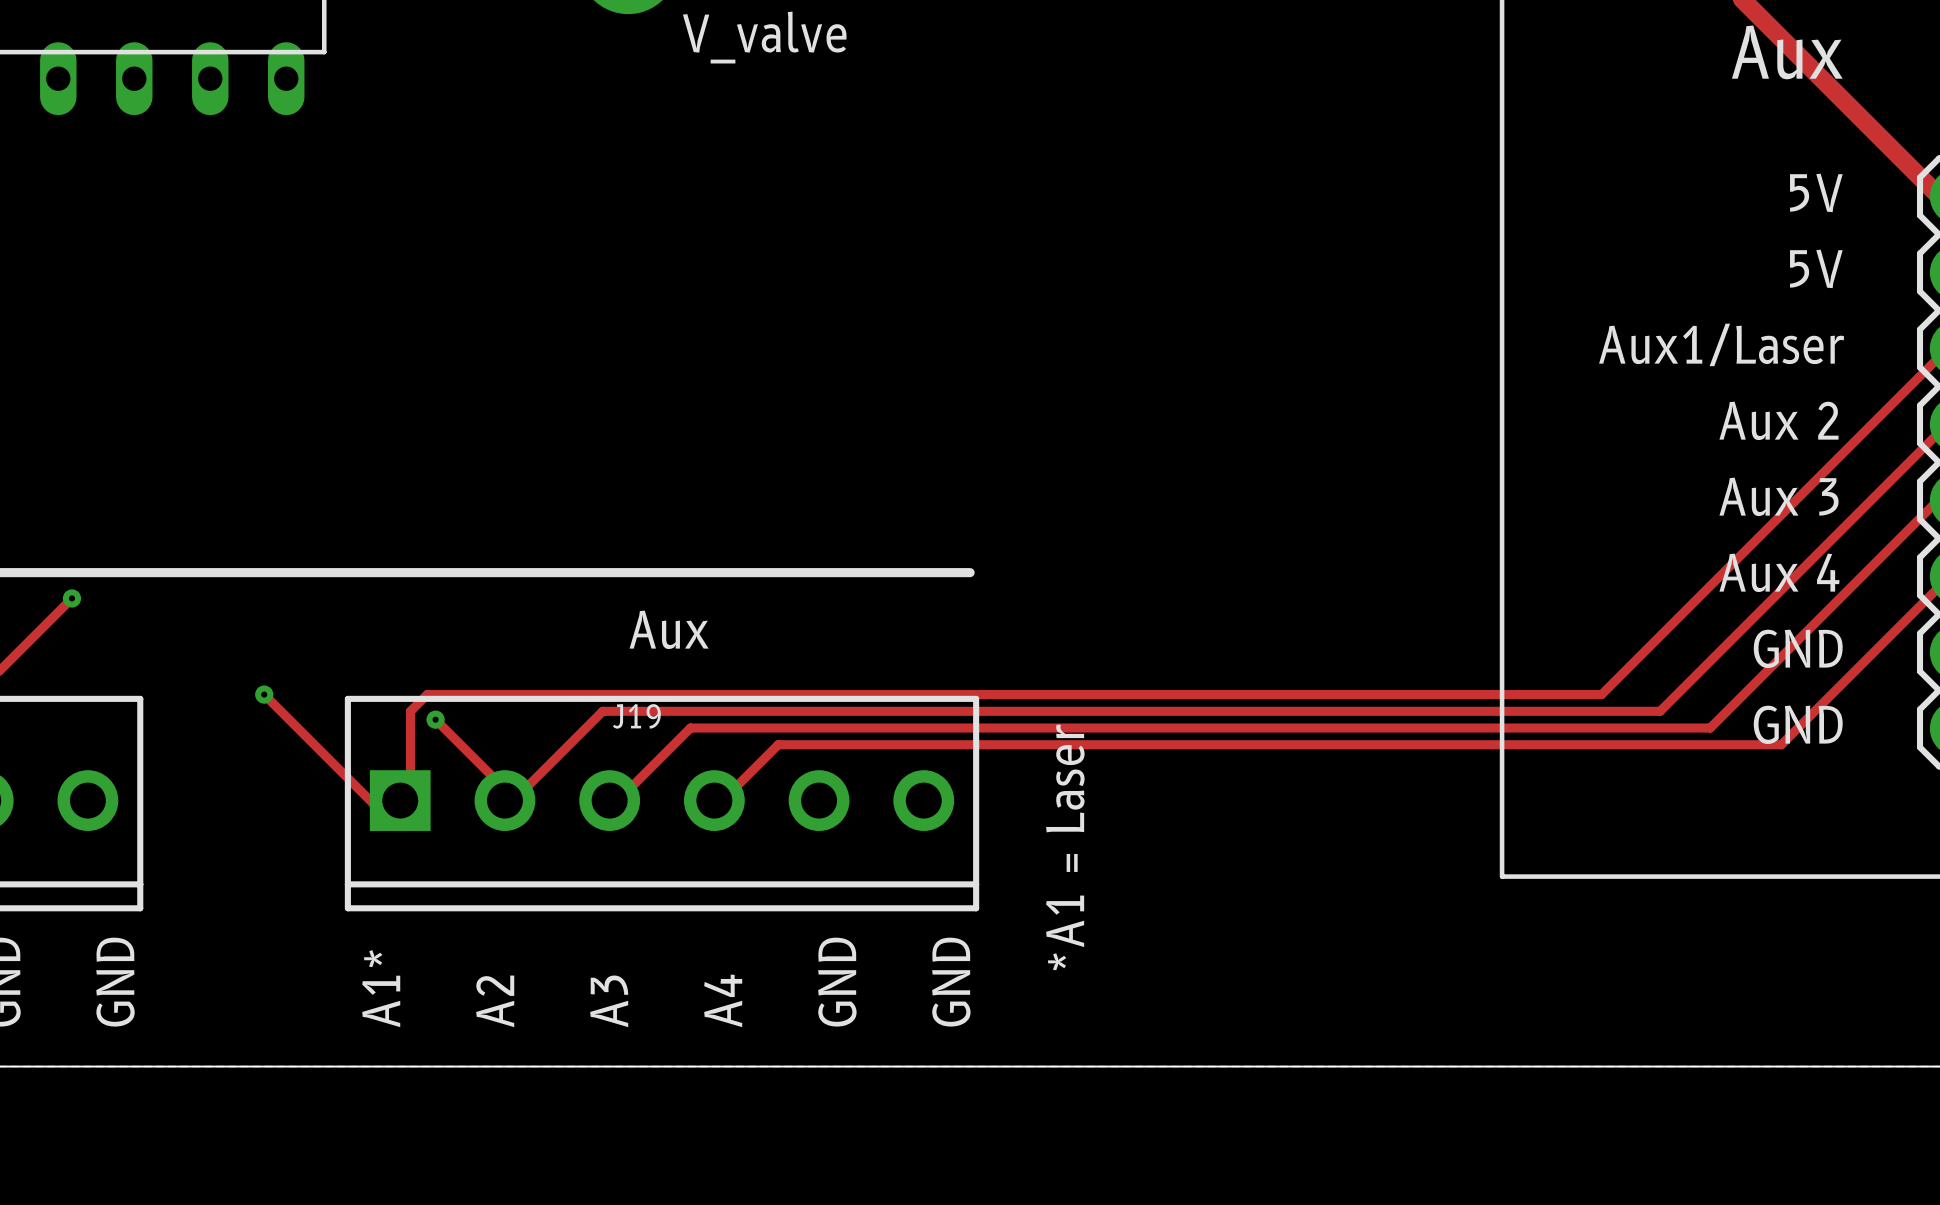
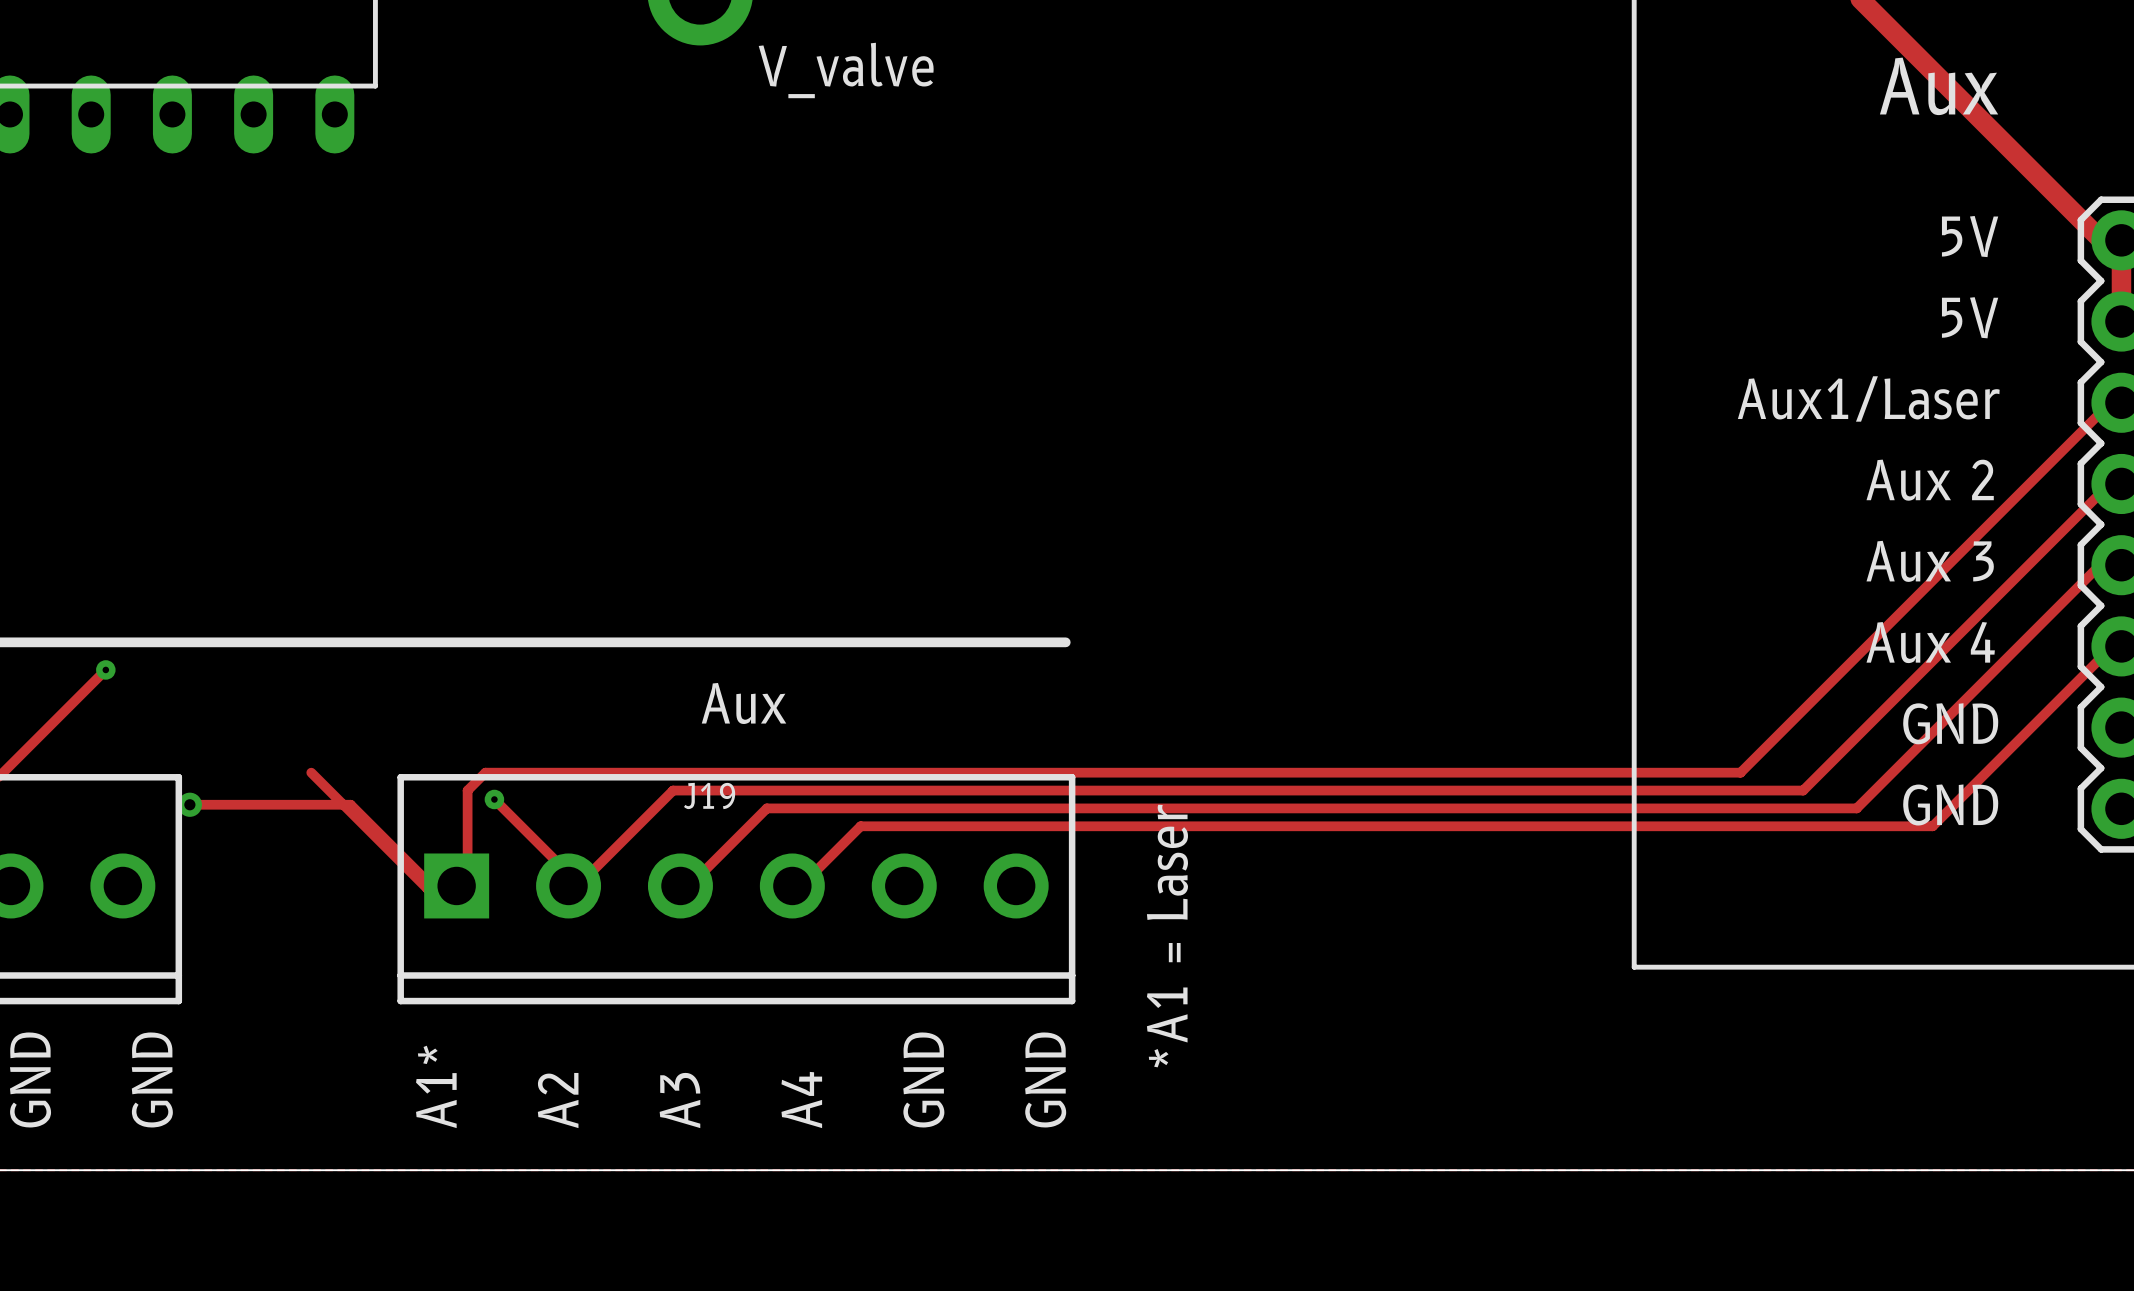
via: (264, 694) -> none
track: none -> (189, 804) (350, 804) (431, 885) (456, 885)
via: none -> (189, 804)

